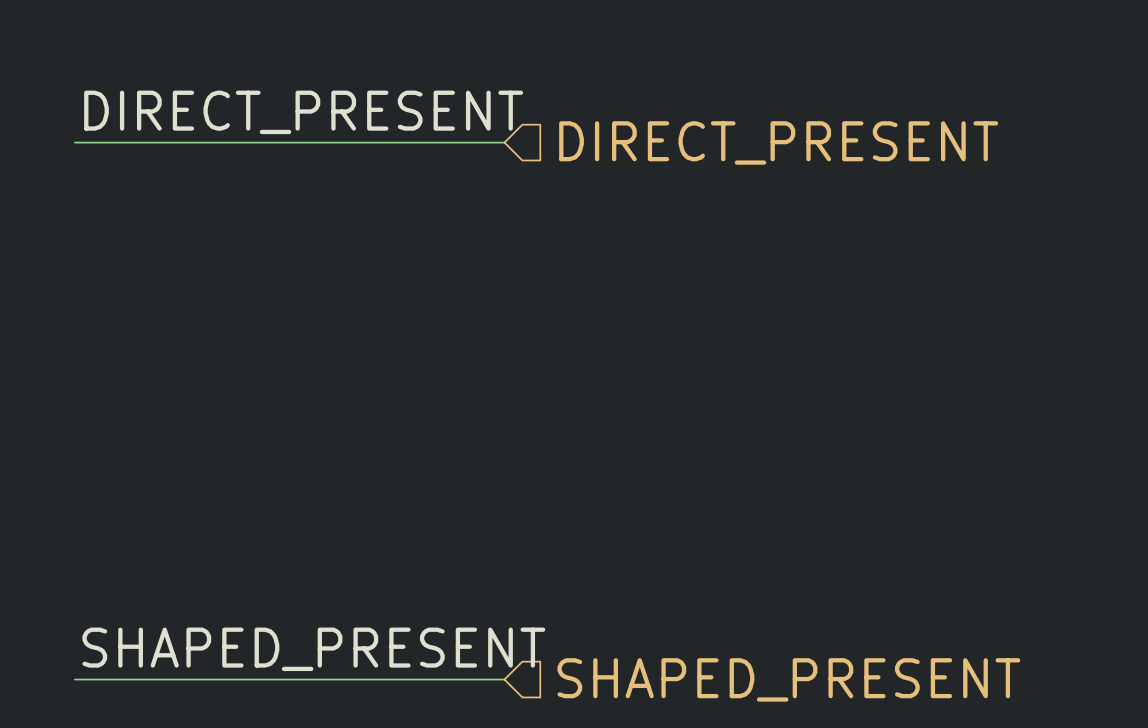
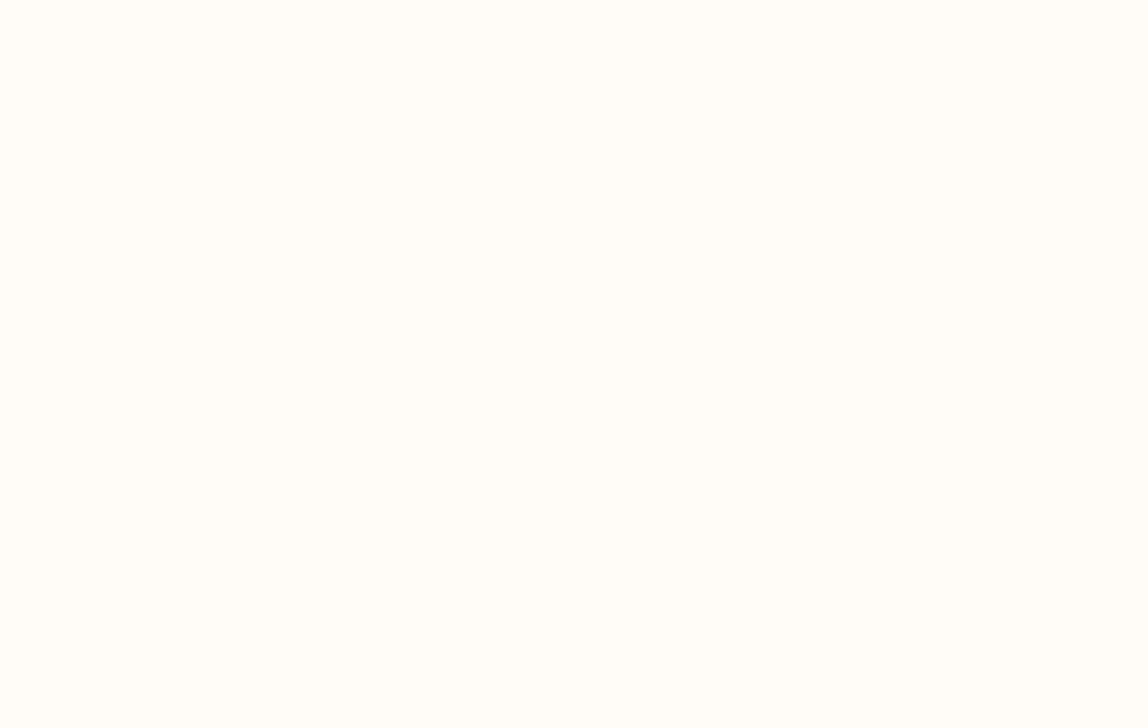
label: DIRECT_PRESENT (303, 112) -> none
wire: (74, 142) (504, 142) -> none
hierarchical label: DIRECT_PRESENT (778, 142) -> none
label: SHAPED_PRESENT (313, 649) -> none
wire: (74, 679) (504, 679) -> none
hierarchical label: SHAPED_PRESENT (788, 679) -> none

